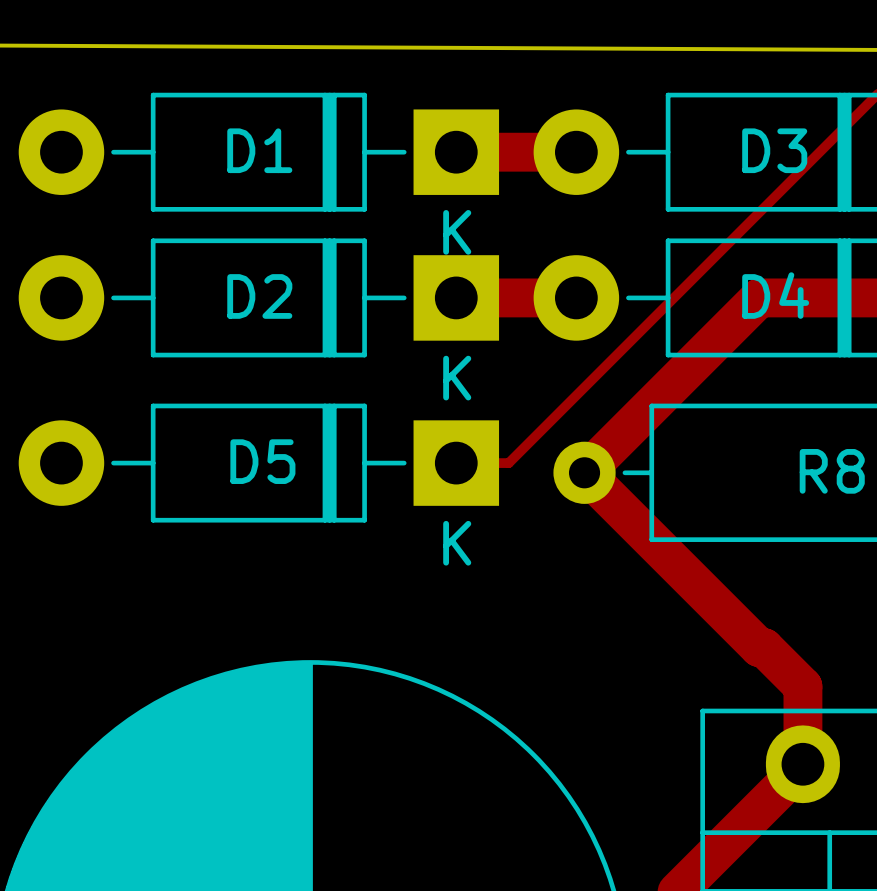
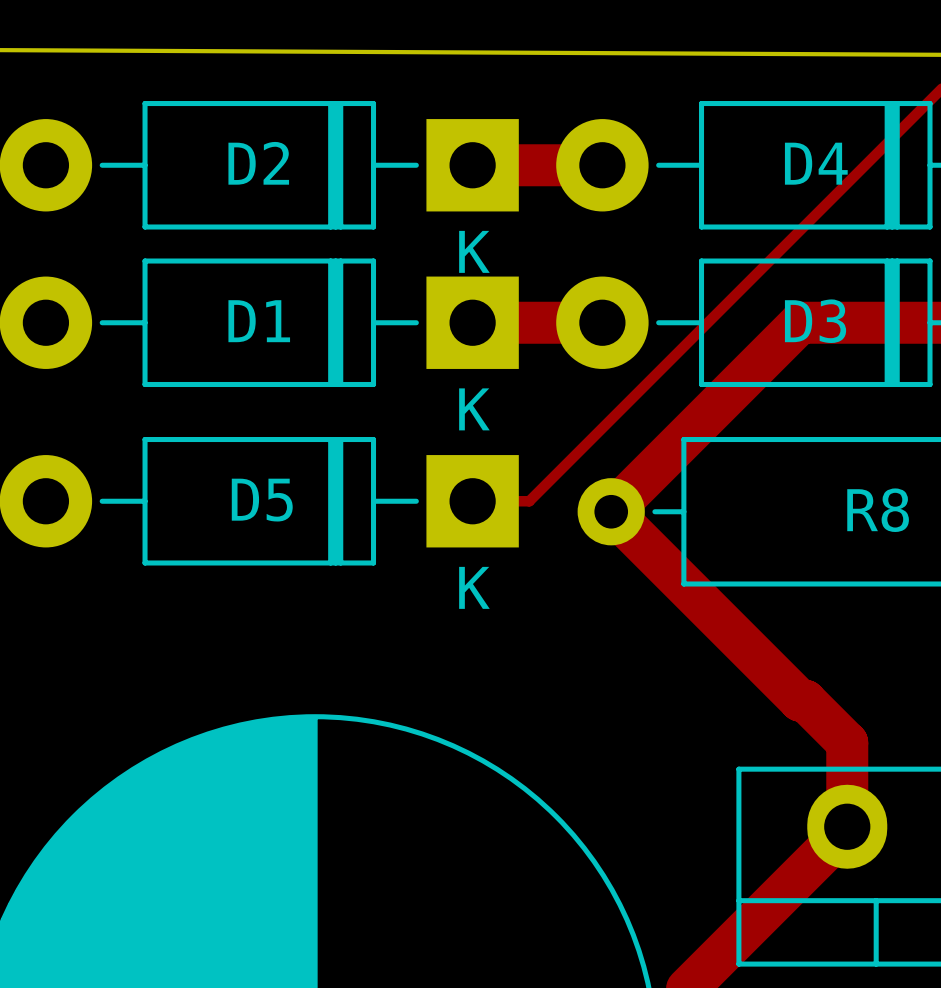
D1 name: D1 (259, 150) -> D2 (258, 163)
D3 name: D3 (774, 150) -> D4 (816, 163)
D4 name: D4 (775, 295) -> D3 (815, 321)
D2 name: D2 (259, 296) -> D1 (259, 321)

